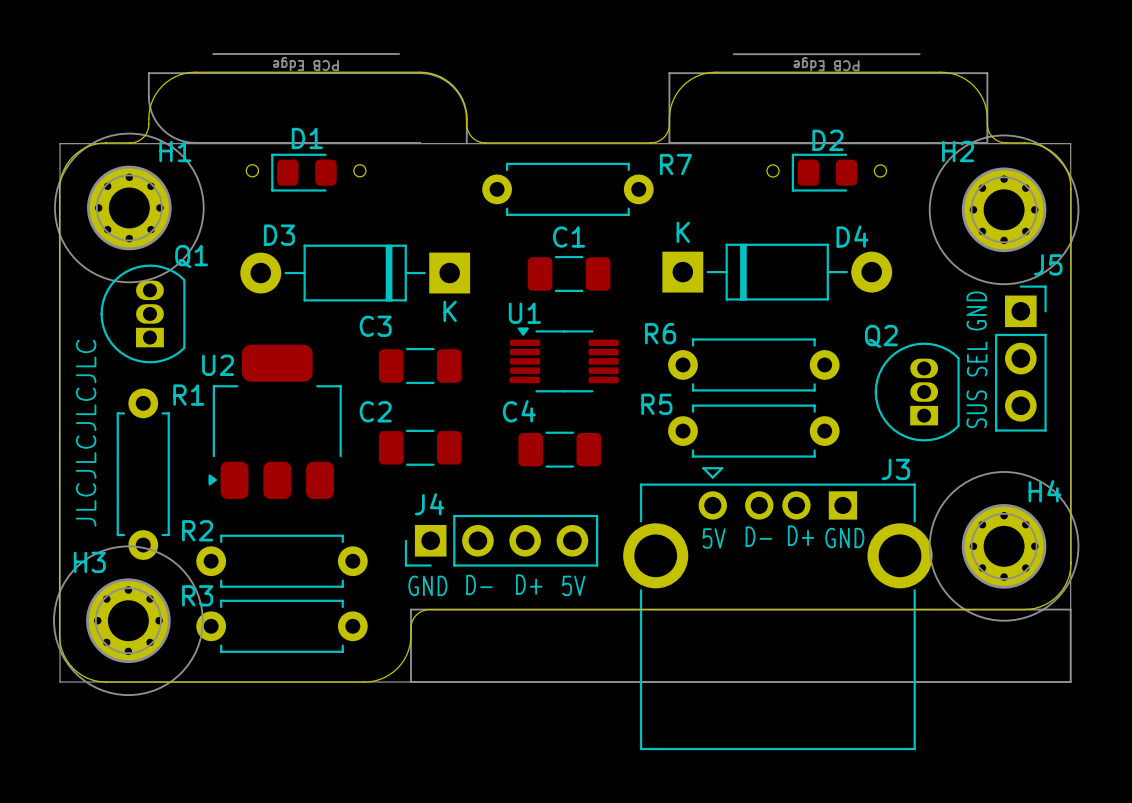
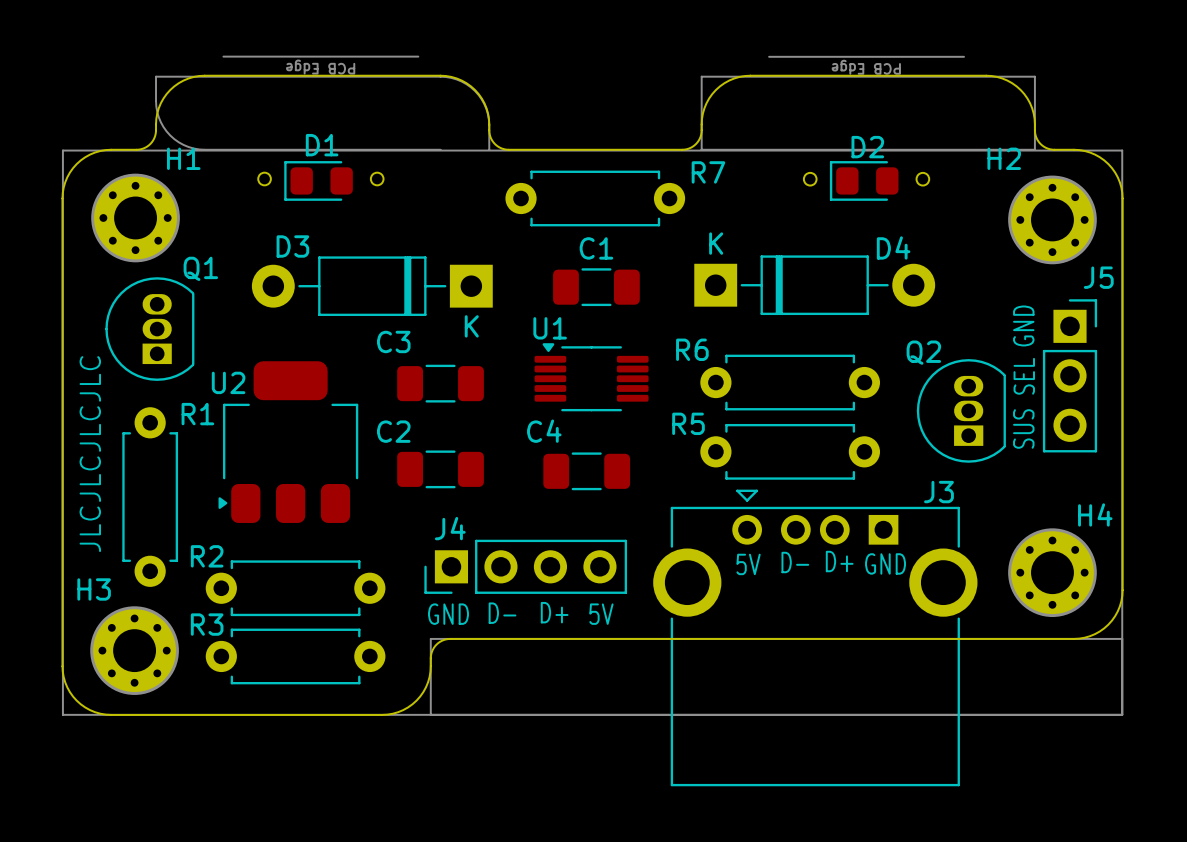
drawing: [54, 132, 205, 284] -> none
drawing: [928, 134, 1080, 286] -> none
drawing: [928, 471, 1080, 622] -> none
drawing: [53, 545, 204, 697] -> none

